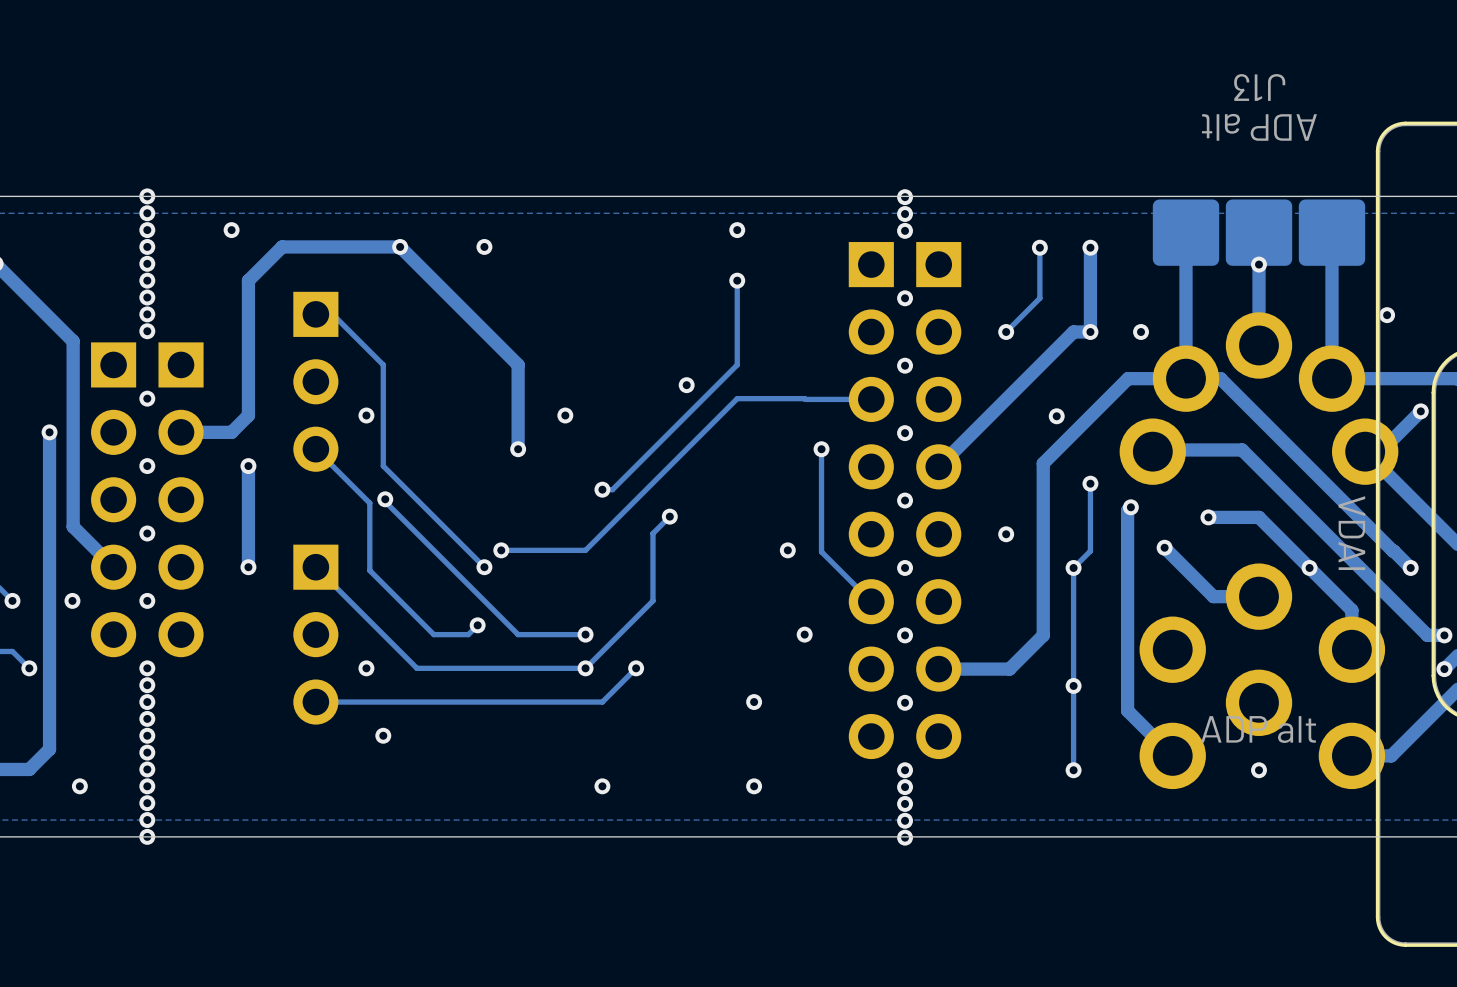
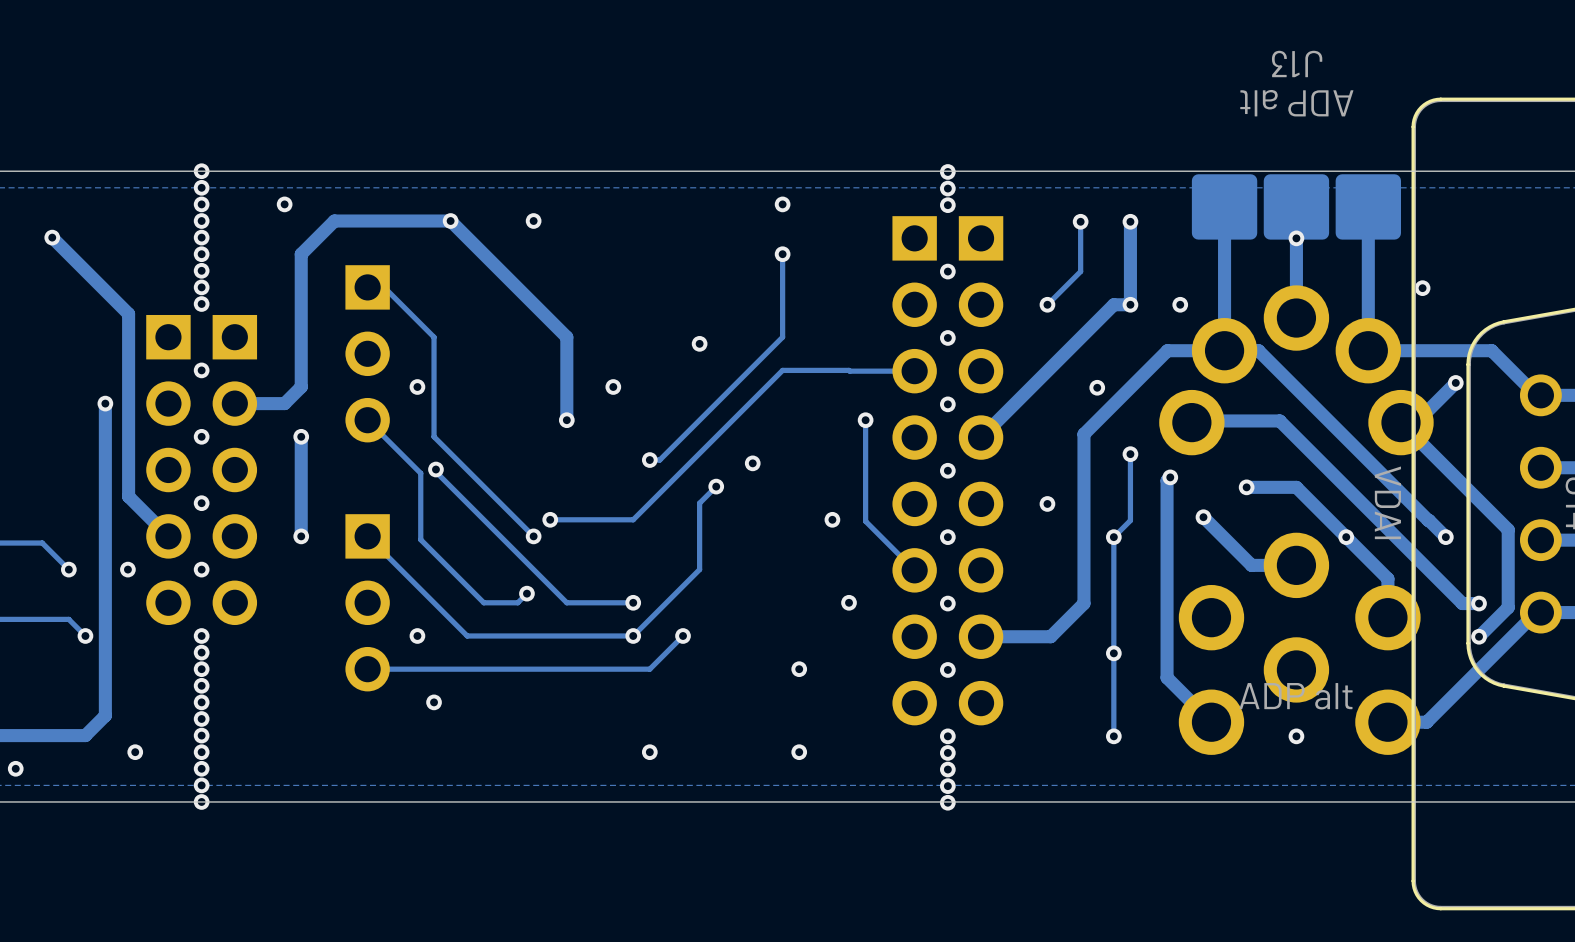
via position: (686, 385) -> (699, 343)
via: none -> (752, 463)

